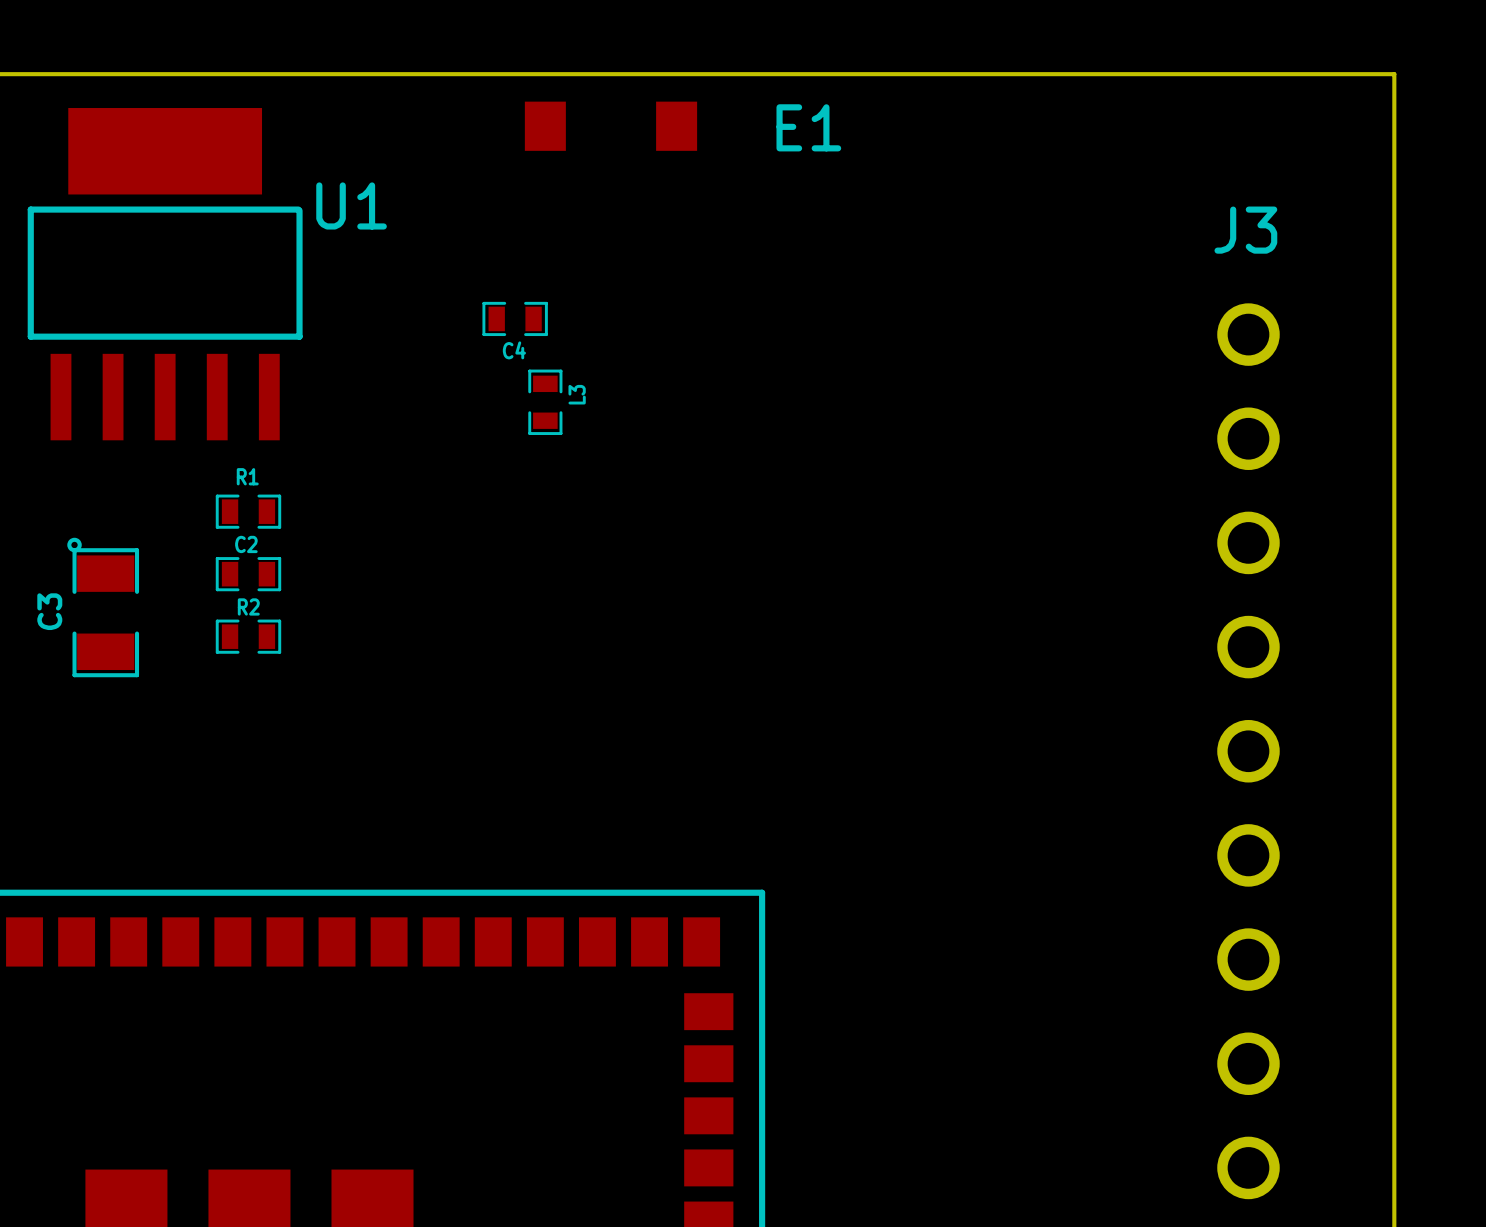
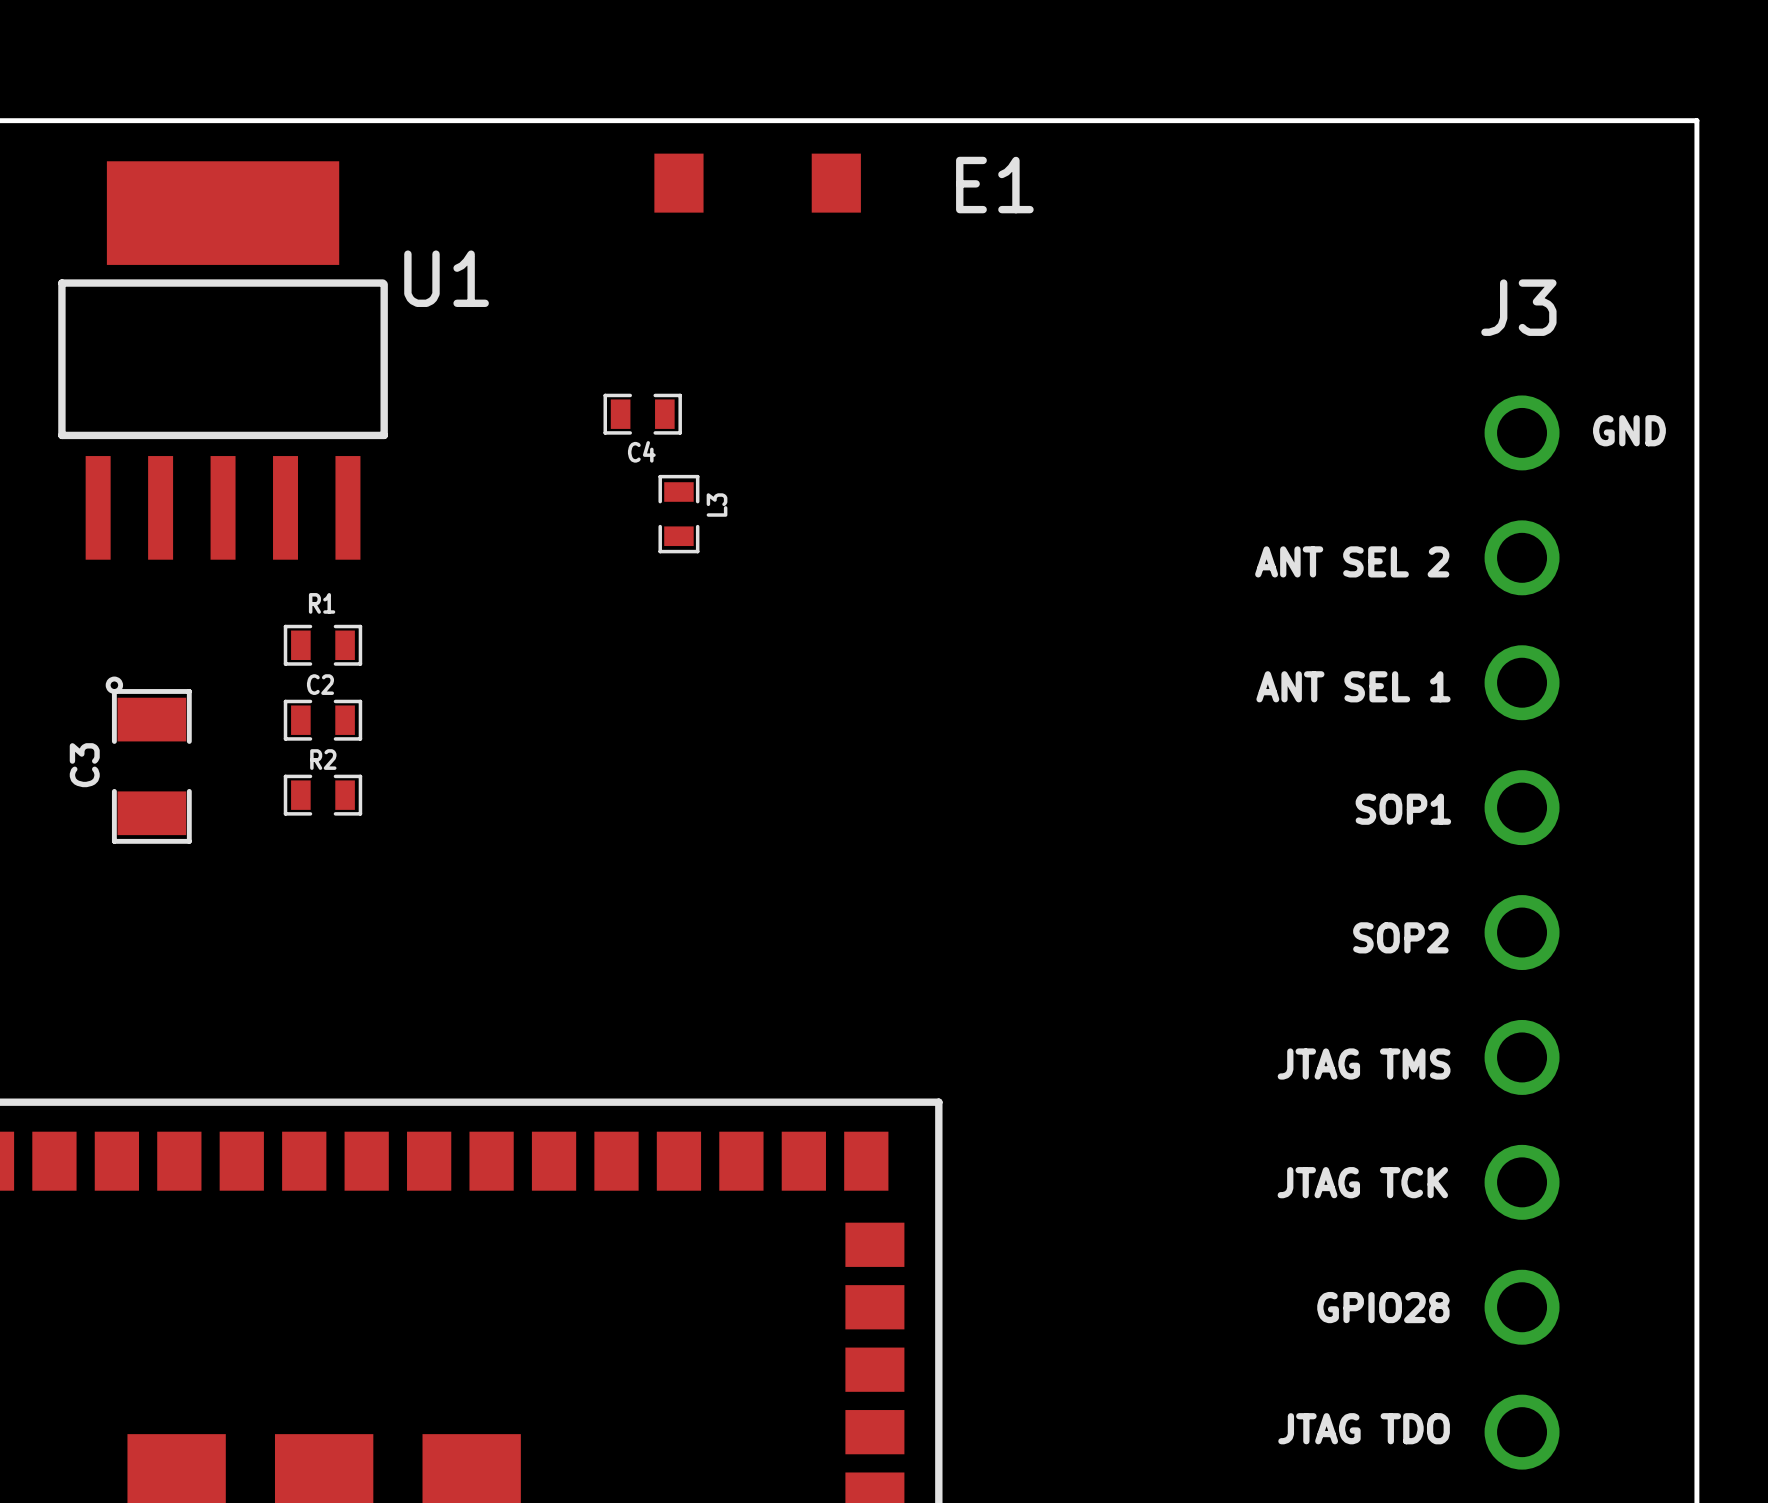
text: none -> GND (1629, 430)
text: none -> ANT SEL 2 (1352, 561)
text: none -> ANT SEL 1 (1353, 686)
text: none -> SOP1 (1403, 809)
text: none -> SOP2 (1400, 937)
text: none -> JTAG TMS (1364, 1064)
text: none -> JTAG TCK (1362, 1182)
text: none -> GPIO28 (1383, 1307)
text: none -> JTAG TDO (1364, 1428)

